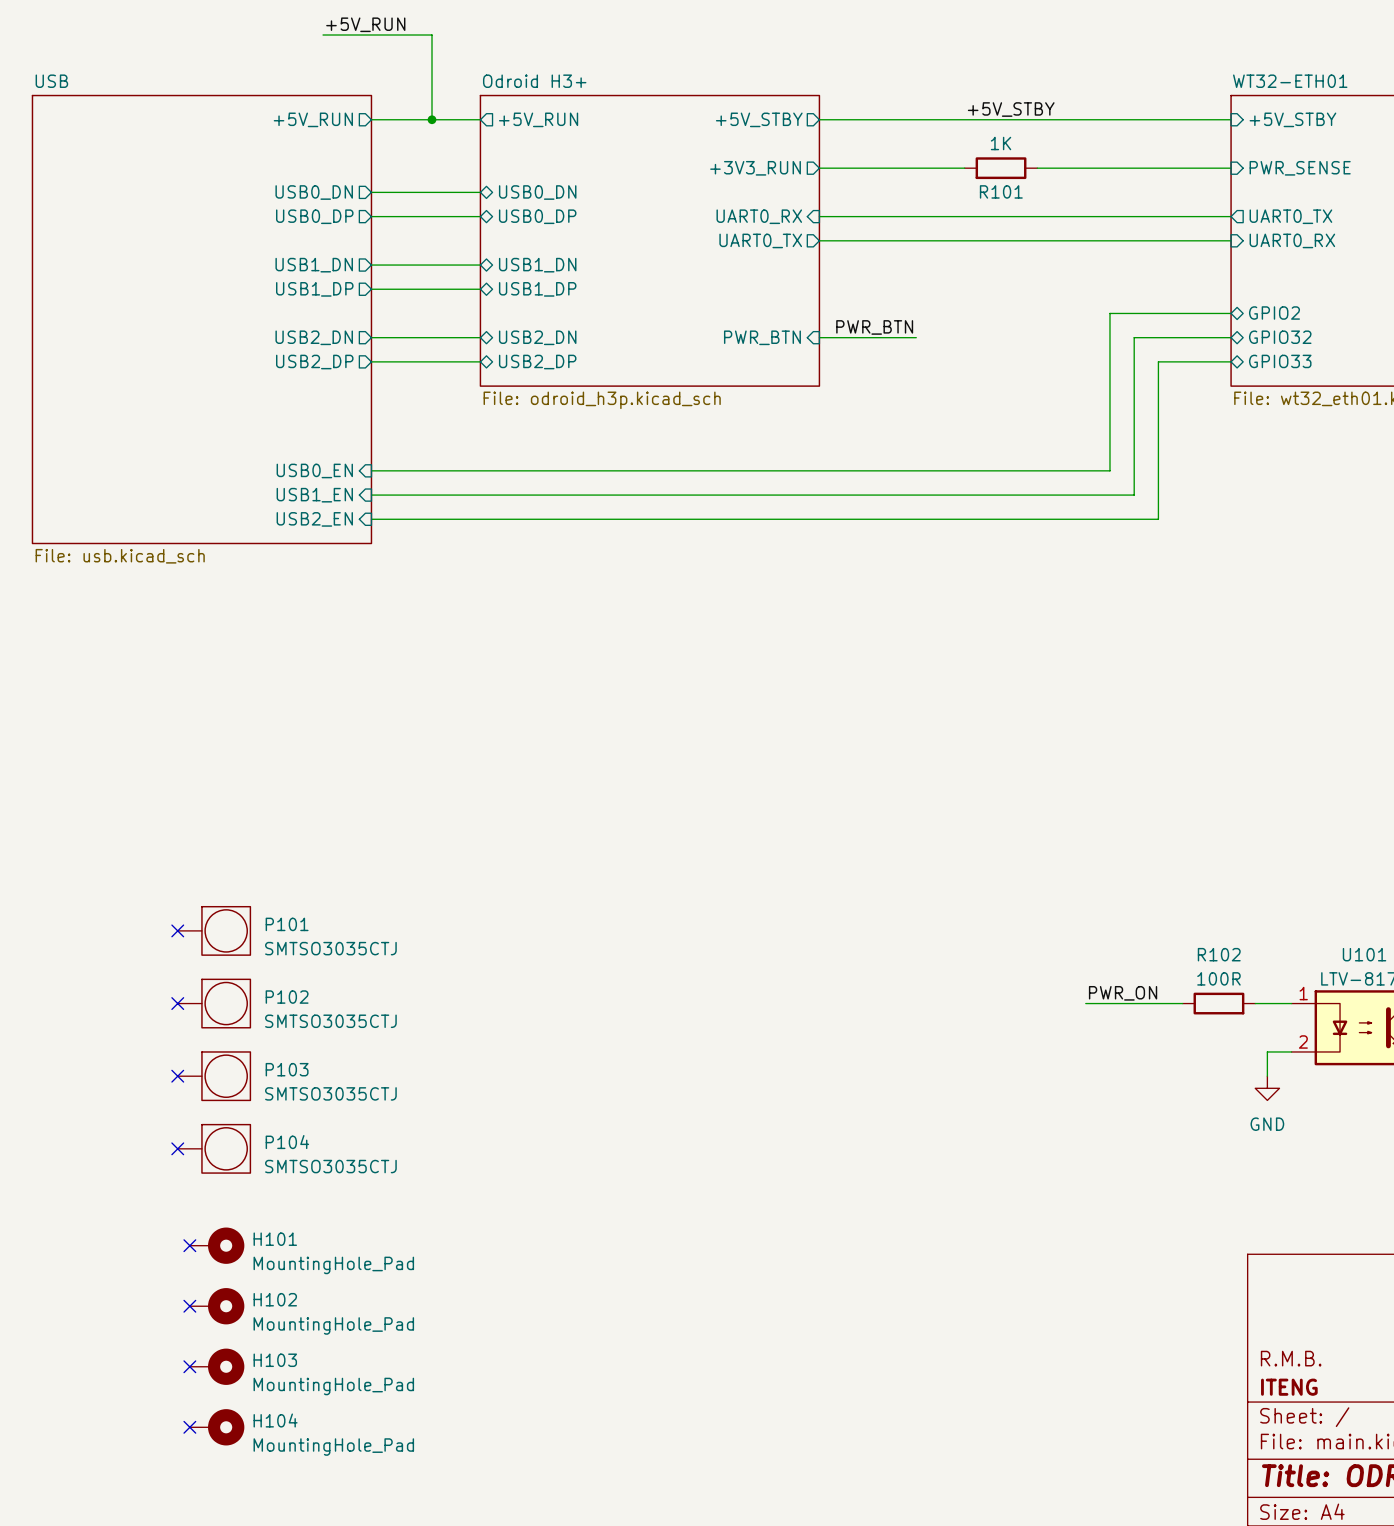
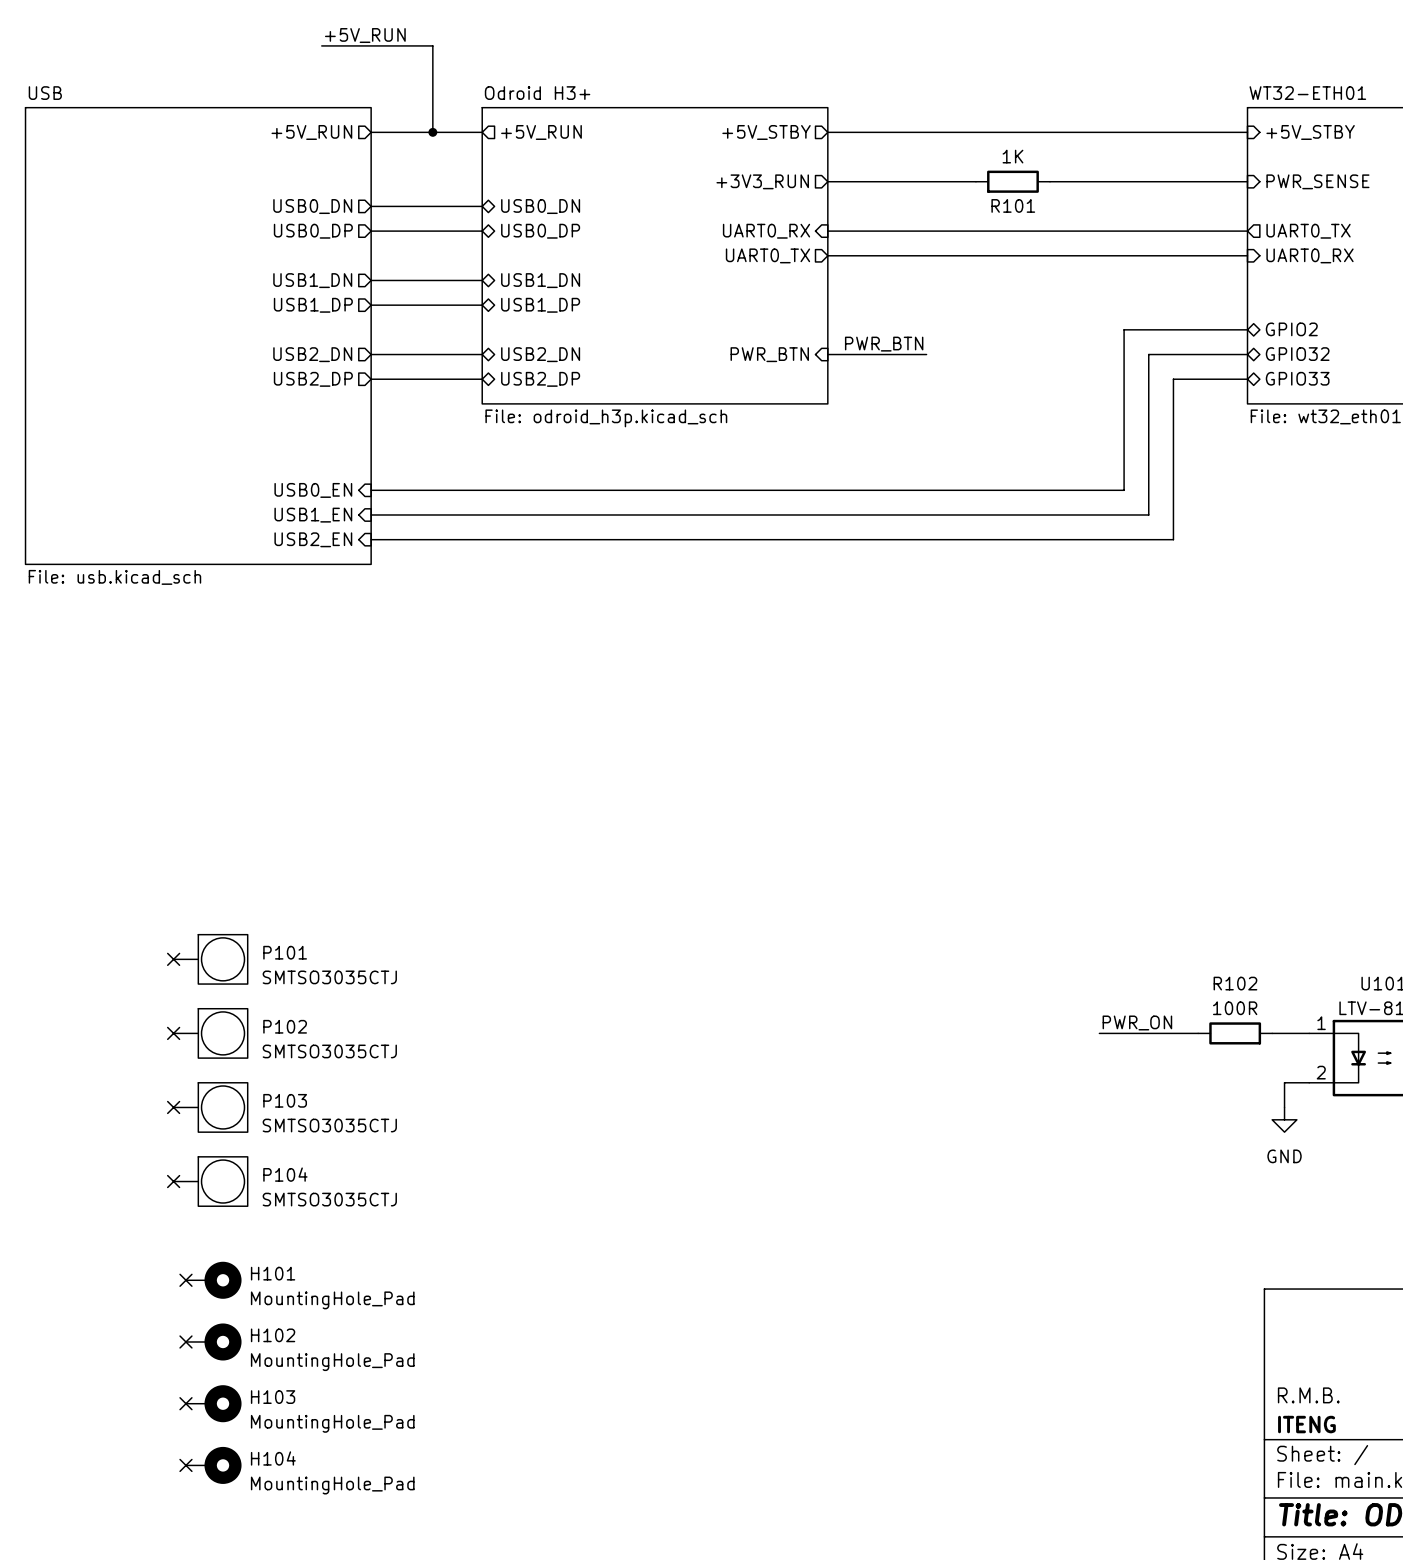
label: +5V_STBY (1011, 109) -> none

